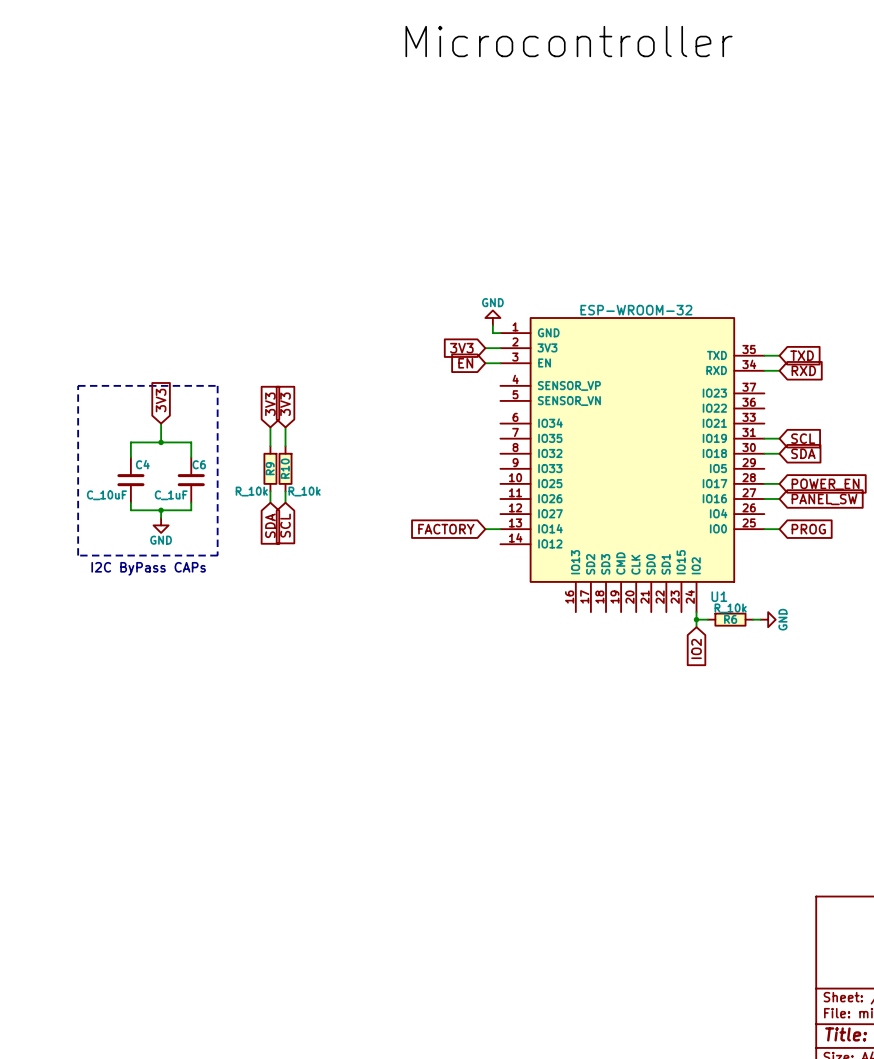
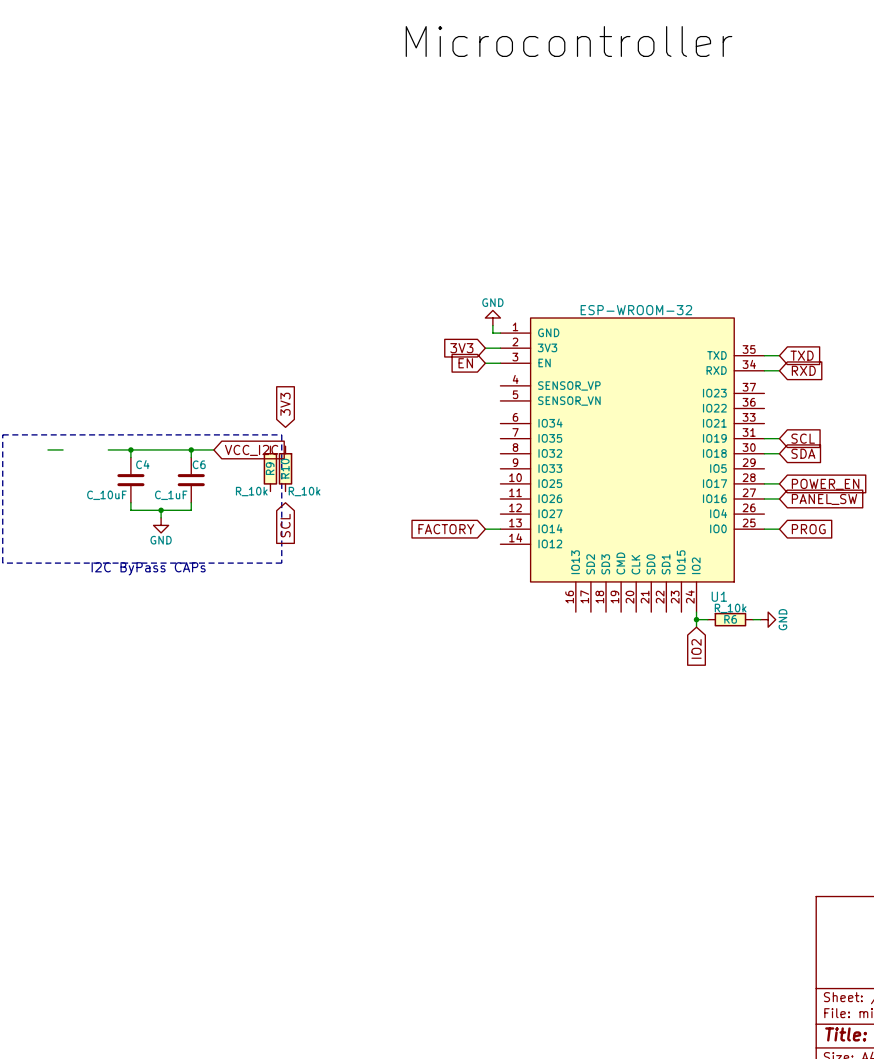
line: (78, 385) (78, 555) (217, 555) (217, 385) (78, 385) -> none
global label: 3V3 (161, 400) -> none
global label: 3V3 (270, 404) -> none
wire: (161, 423) (161, 442) -> none
wire: (270, 427) (270, 446) -> none
wire: (285, 427) (285, 446) -> none
line: none -> (2, 434) (2, 563) (281, 563) (281, 434) (2, 434)
junction: (161, 442) -> none
wire: none -> (47, 449) (63, 449)
wire: none -> (108, 449) (213, 449)
wire: (130, 449) (130, 442) (191, 442) (191, 449) -> none
junction: none -> (130, 449)
junction: none -> (191, 449)
global label: none -> VCC_I2C (251, 450)
wire: (270, 491) (270, 502) -> none
wire: (285, 491) (285, 502) -> none
global label: SDA (270, 525) -> none

